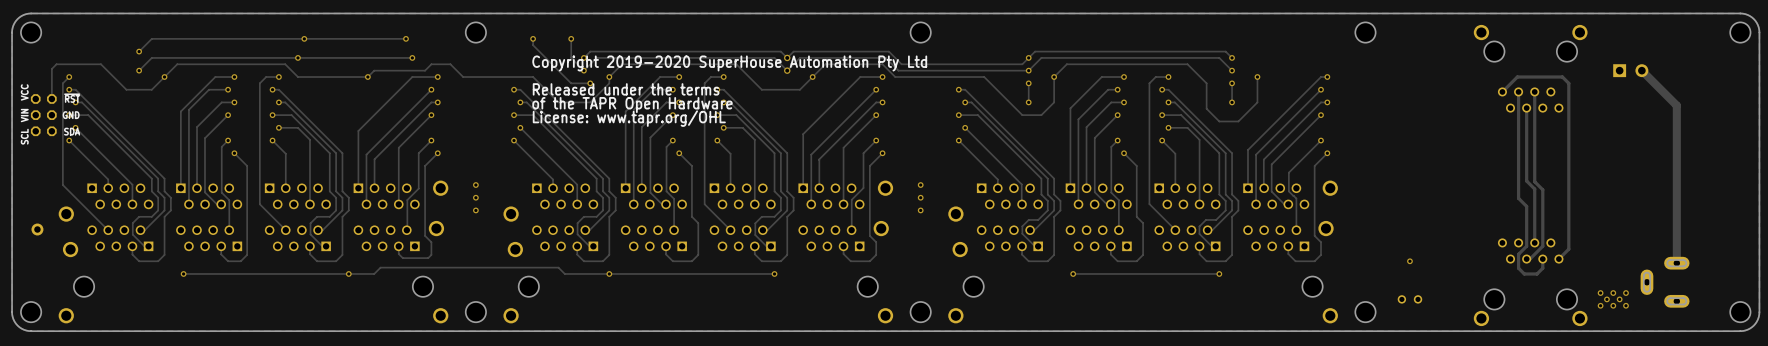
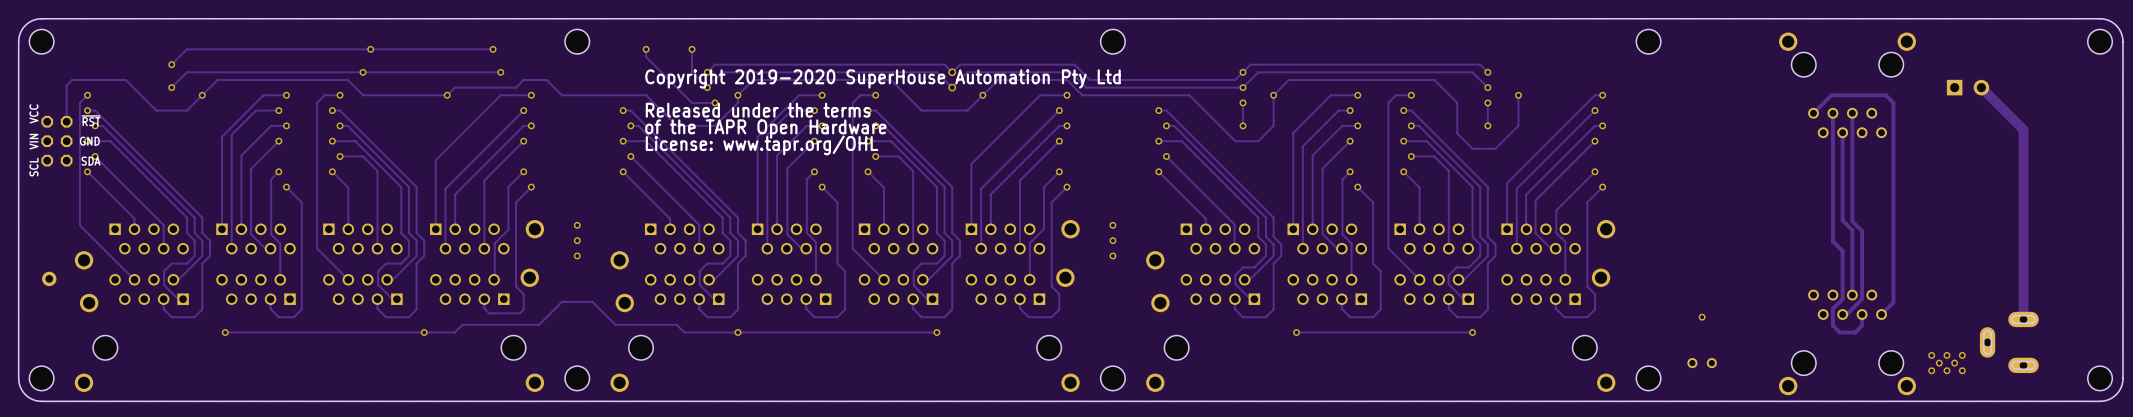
track: (507, 267) (444, 267) -> (615, 324) (592, 301) (561, 301) (539, 324)

